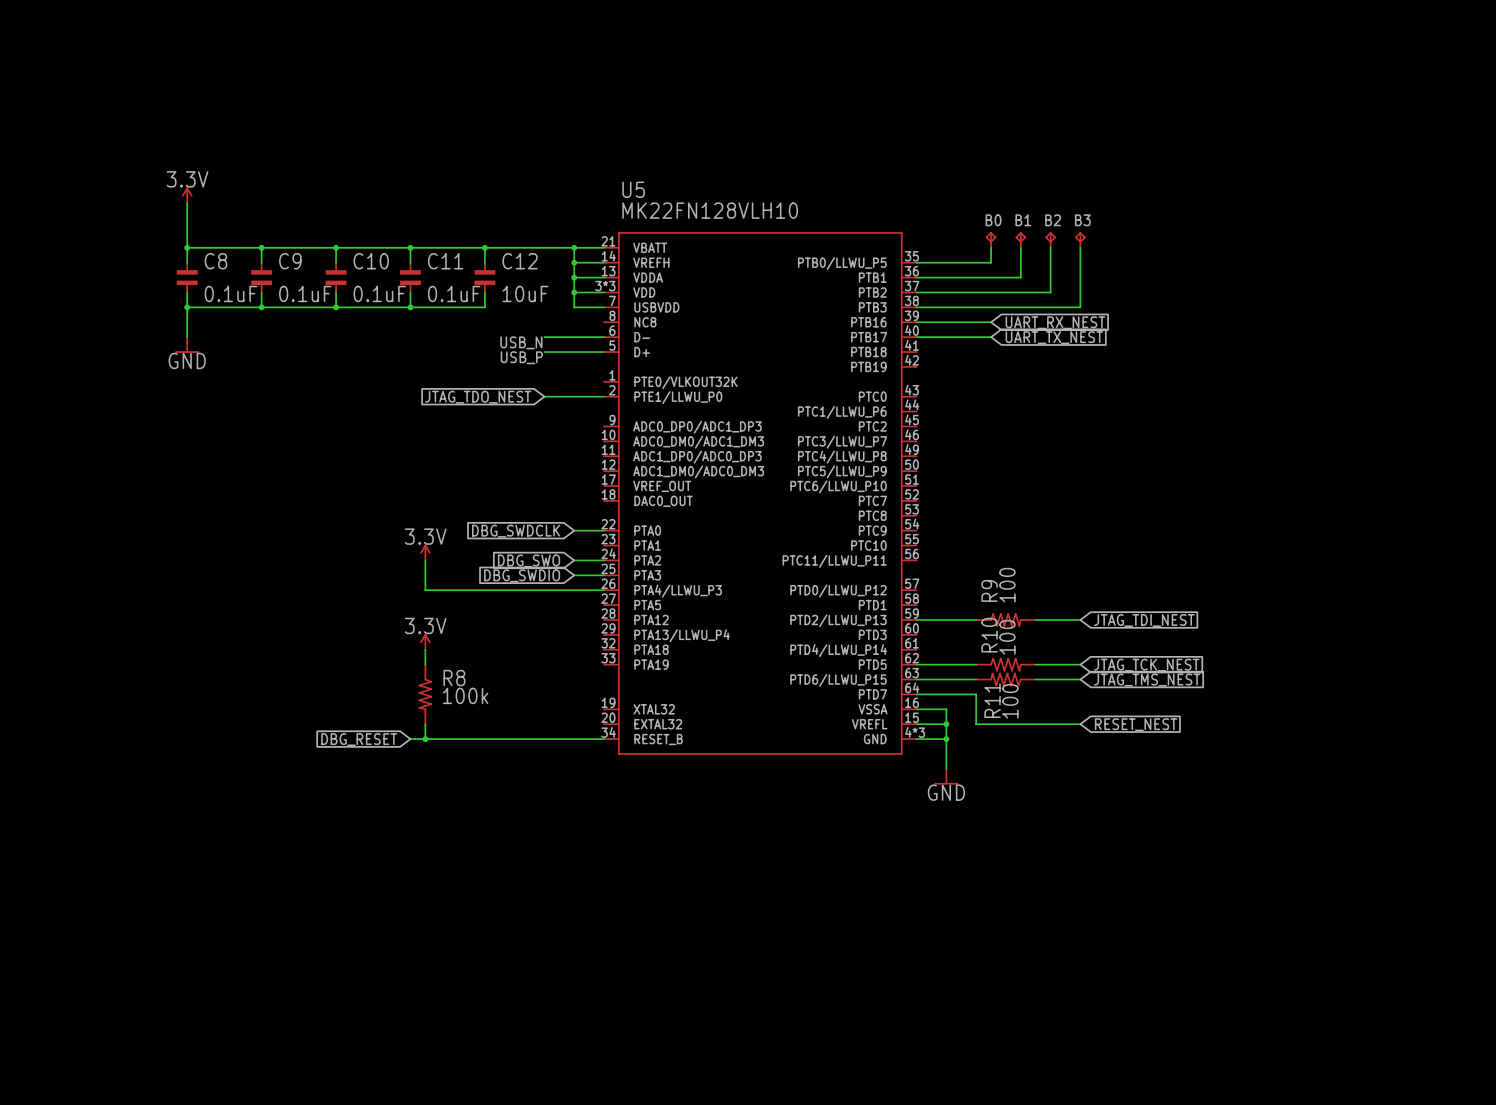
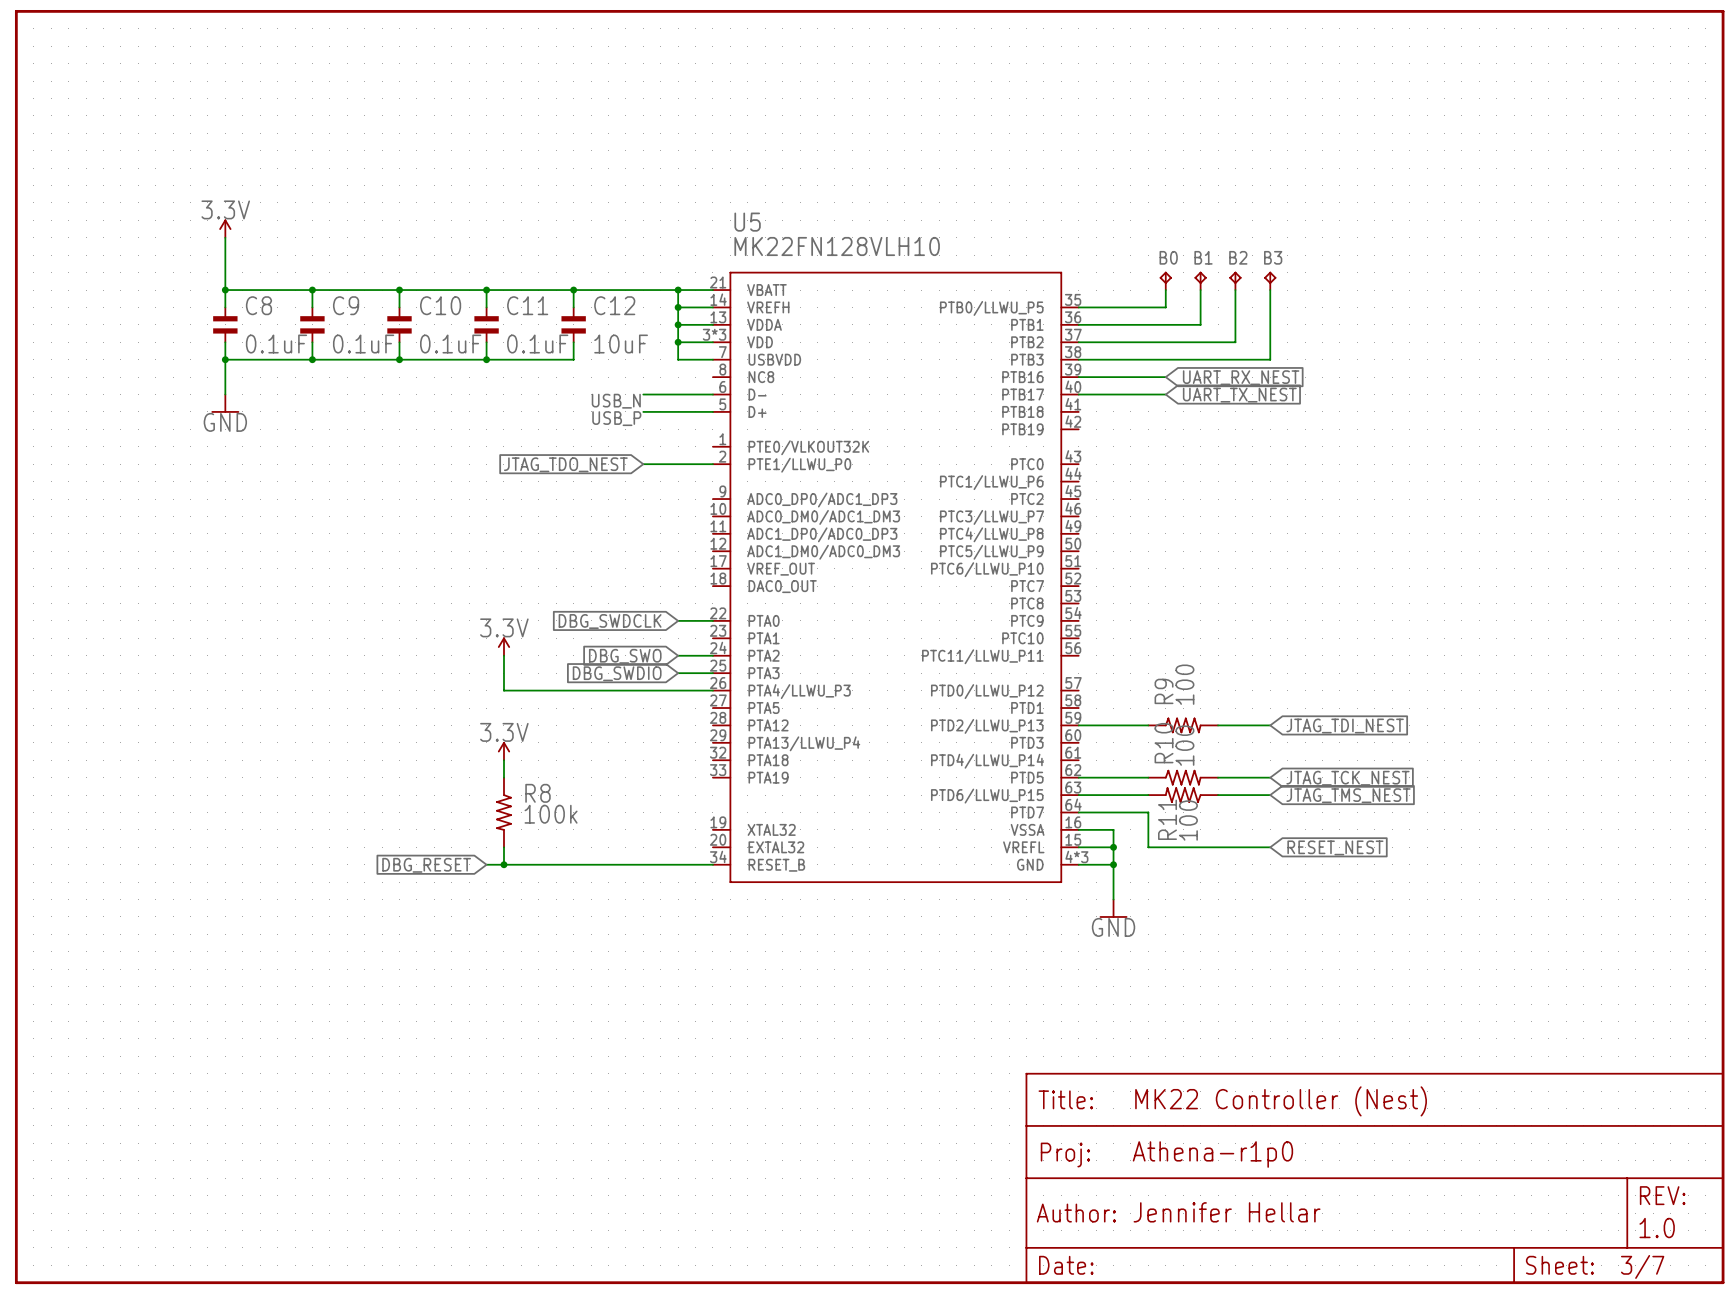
part: none -> (869, 647)
part: none -> (1374, 1178)

